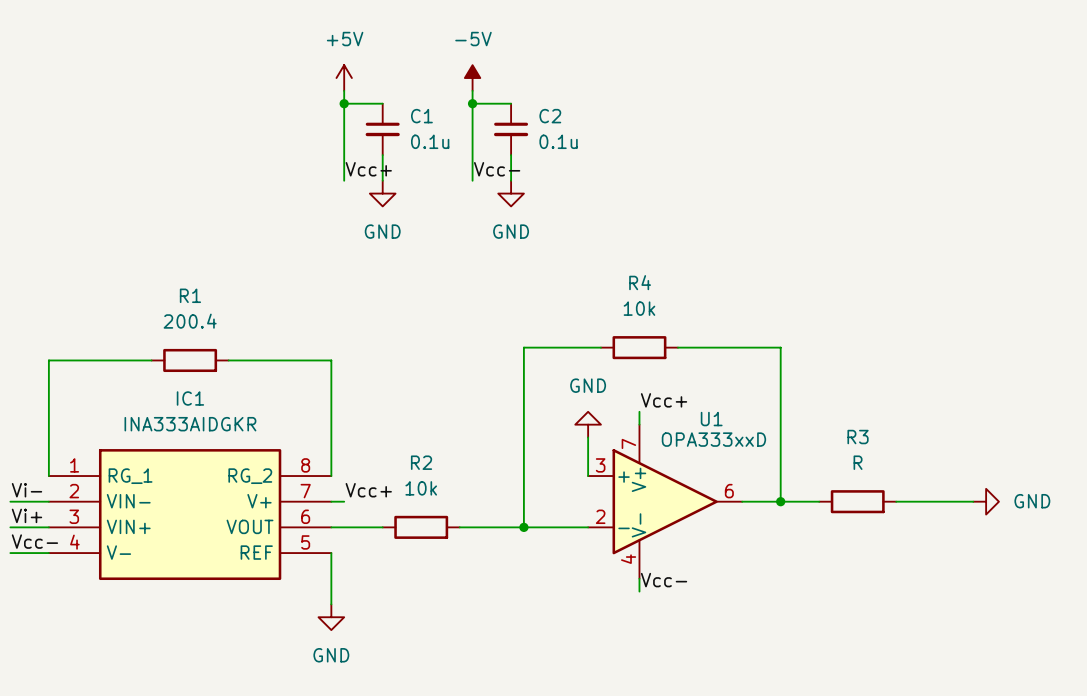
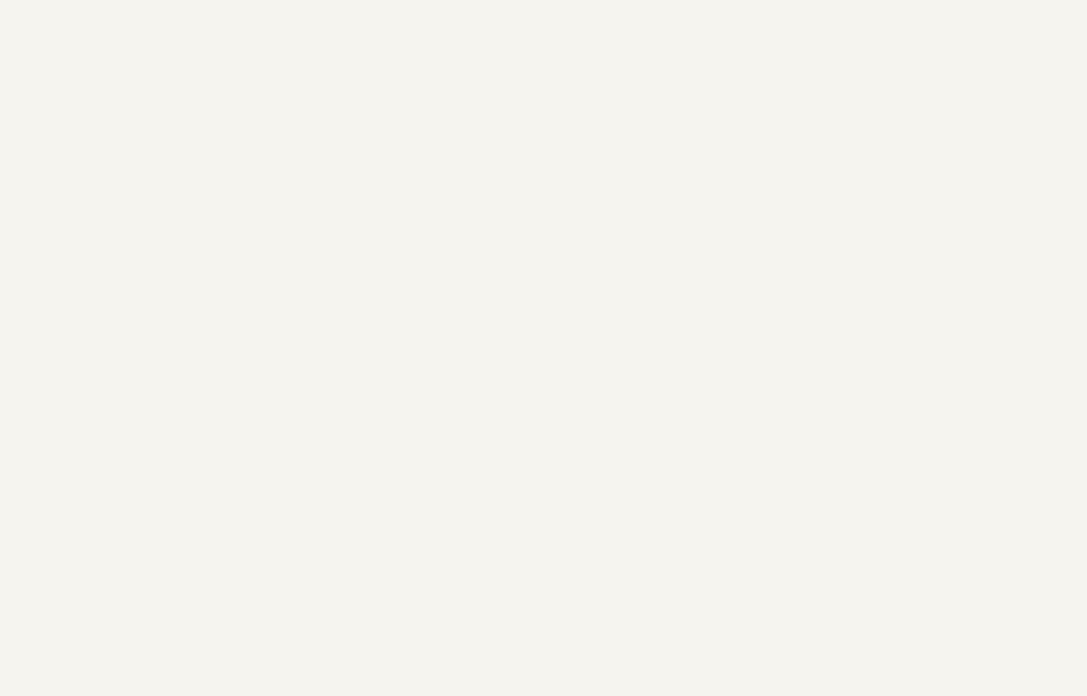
power symbol: +5V (344, 78) -> none
power symbol: -5V (472, 78) -> none
wire: (344, 90) (344, 180) -> none
wire: (472, 90) (472, 180) -> none
wire: (344, 103) (382, 103) -> none
junction: (344, 103) -> none
wire: (472, 103) (511, 103) -> none
junction: (472, 103) -> none
C1: 0.1u (382, 129) -> none
C2: 0.1u (511, 129) -> none
wire: (382, 155) (382, 180) -> none
wire: (511, 155) (511, 180) -> none
label: Vcc+ (368, 169) -> none
label: Vcc- (497, 169) -> none
power symbol: GND (382, 193) -> none
power symbol: GND (511, 193) -> none
wire: (600, 347) (523, 347) (523, 527) -> none
R4: 10k (639, 347) -> none
wire: (677, 347) (780, 347) (780, 501) -> none
wire: (151, 360) (48, 360) (48, 476) -> none
R1: 200.4 (190, 360) -> none
wire: (228, 360) (331, 360) (331, 476) -> none
label: Vcc+ (664, 400) -> none
wire: (639, 411) (639, 424) -> none
power symbol: GND (588, 424) -> none
wire: (588, 437) (588, 476) -> none
label: Vi- (26, 490) -> none
label: Vcc+ (368, 490) -> none
wire: (10, 501) (48, 501) -> none
wire: (331, 501) (344, 501) -> none
U1: OPA333xxD (665, 501) -> none
wire: (742, 501) (819, 501) -> none
junction: (780, 501) -> none
R3: R (857, 501) -> none
wire: (896, 501) (973, 501) -> none
power symbol: GND (986, 501) -> none
IC1: INA333AIDGKR (190, 514) -> none
label: Vi+ (26, 515) -> none
wire: (10, 527) (48, 527) -> none
wire: (331, 527) (382, 527) -> none
R2: 10k (421, 527) -> none
wire: (459, 527) (588, 527) -> none
junction: (523, 527) -> none
label: Vcc- (34, 541) -> none
wire: (10, 553) (48, 553) -> none
wire: (331, 553) (331, 604) -> none
wire: (639, 578) (639, 591) -> none
label: Vcc- (664, 580) -> none
power symbol: GND (331, 617) -> none

